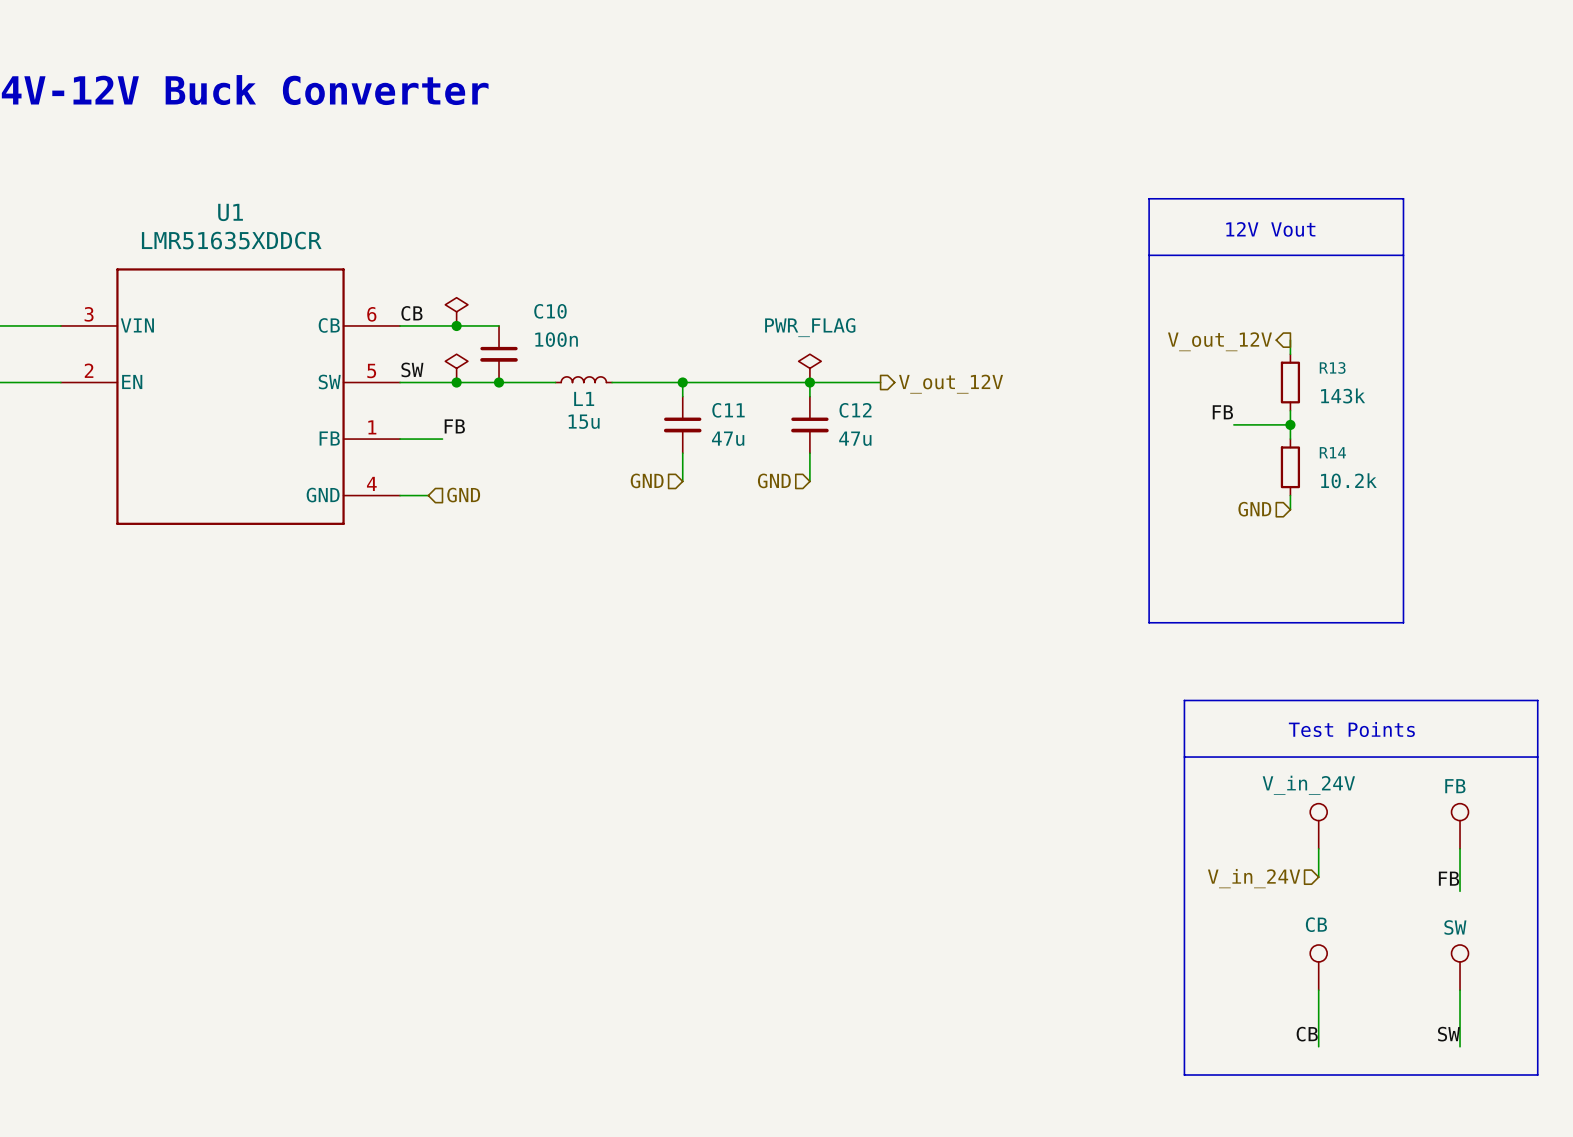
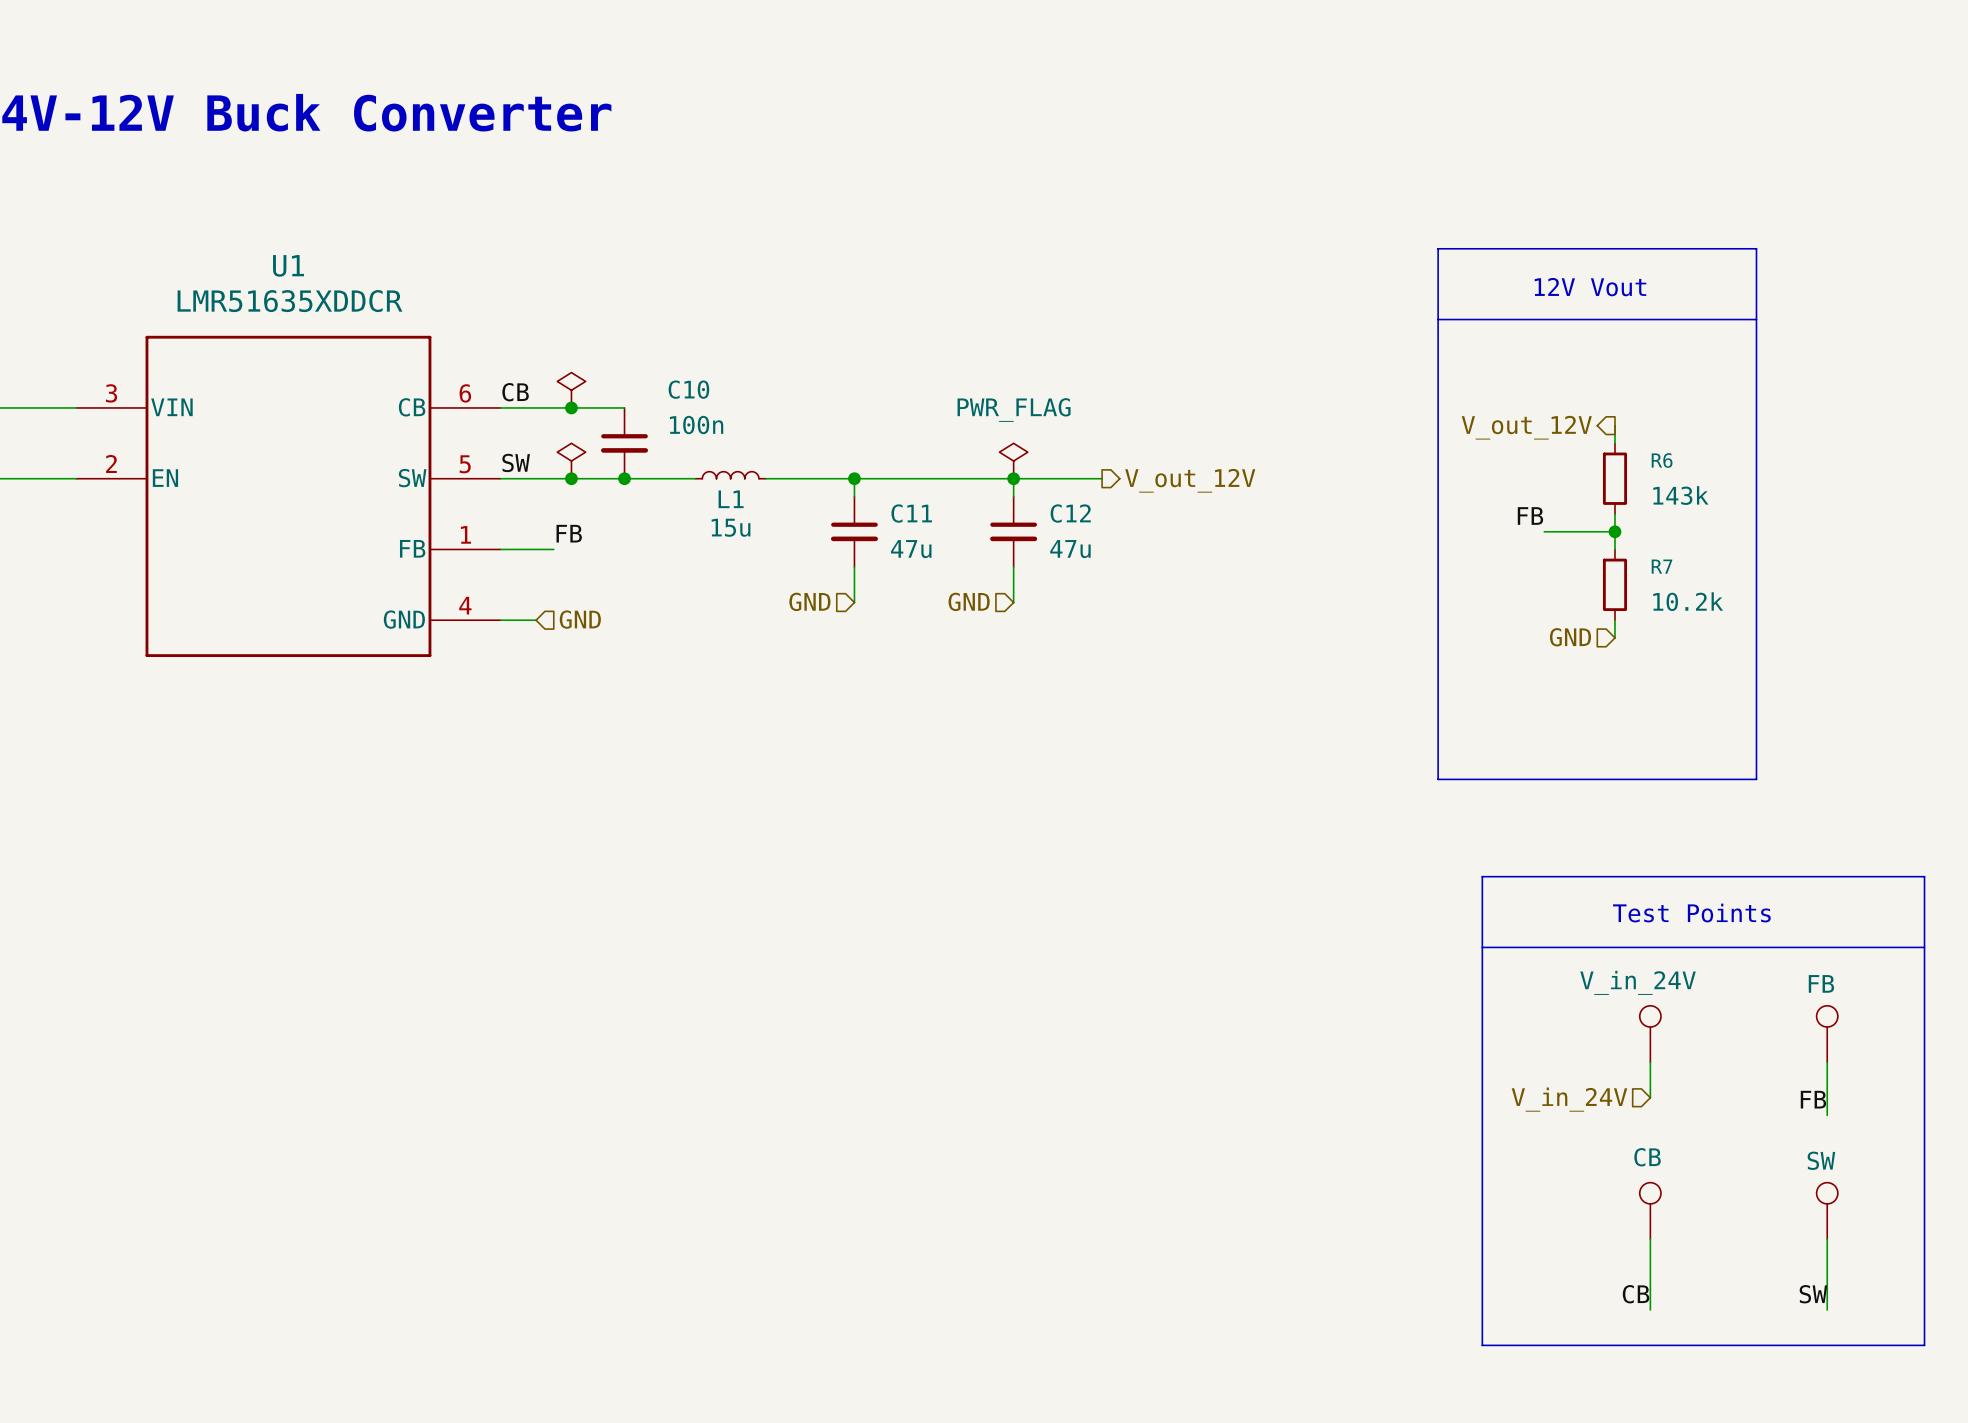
R13 name: R13 (1332, 367) -> R6 (1662, 460)
R14 name: R14 (1332, 452) -> R7 (1662, 566)

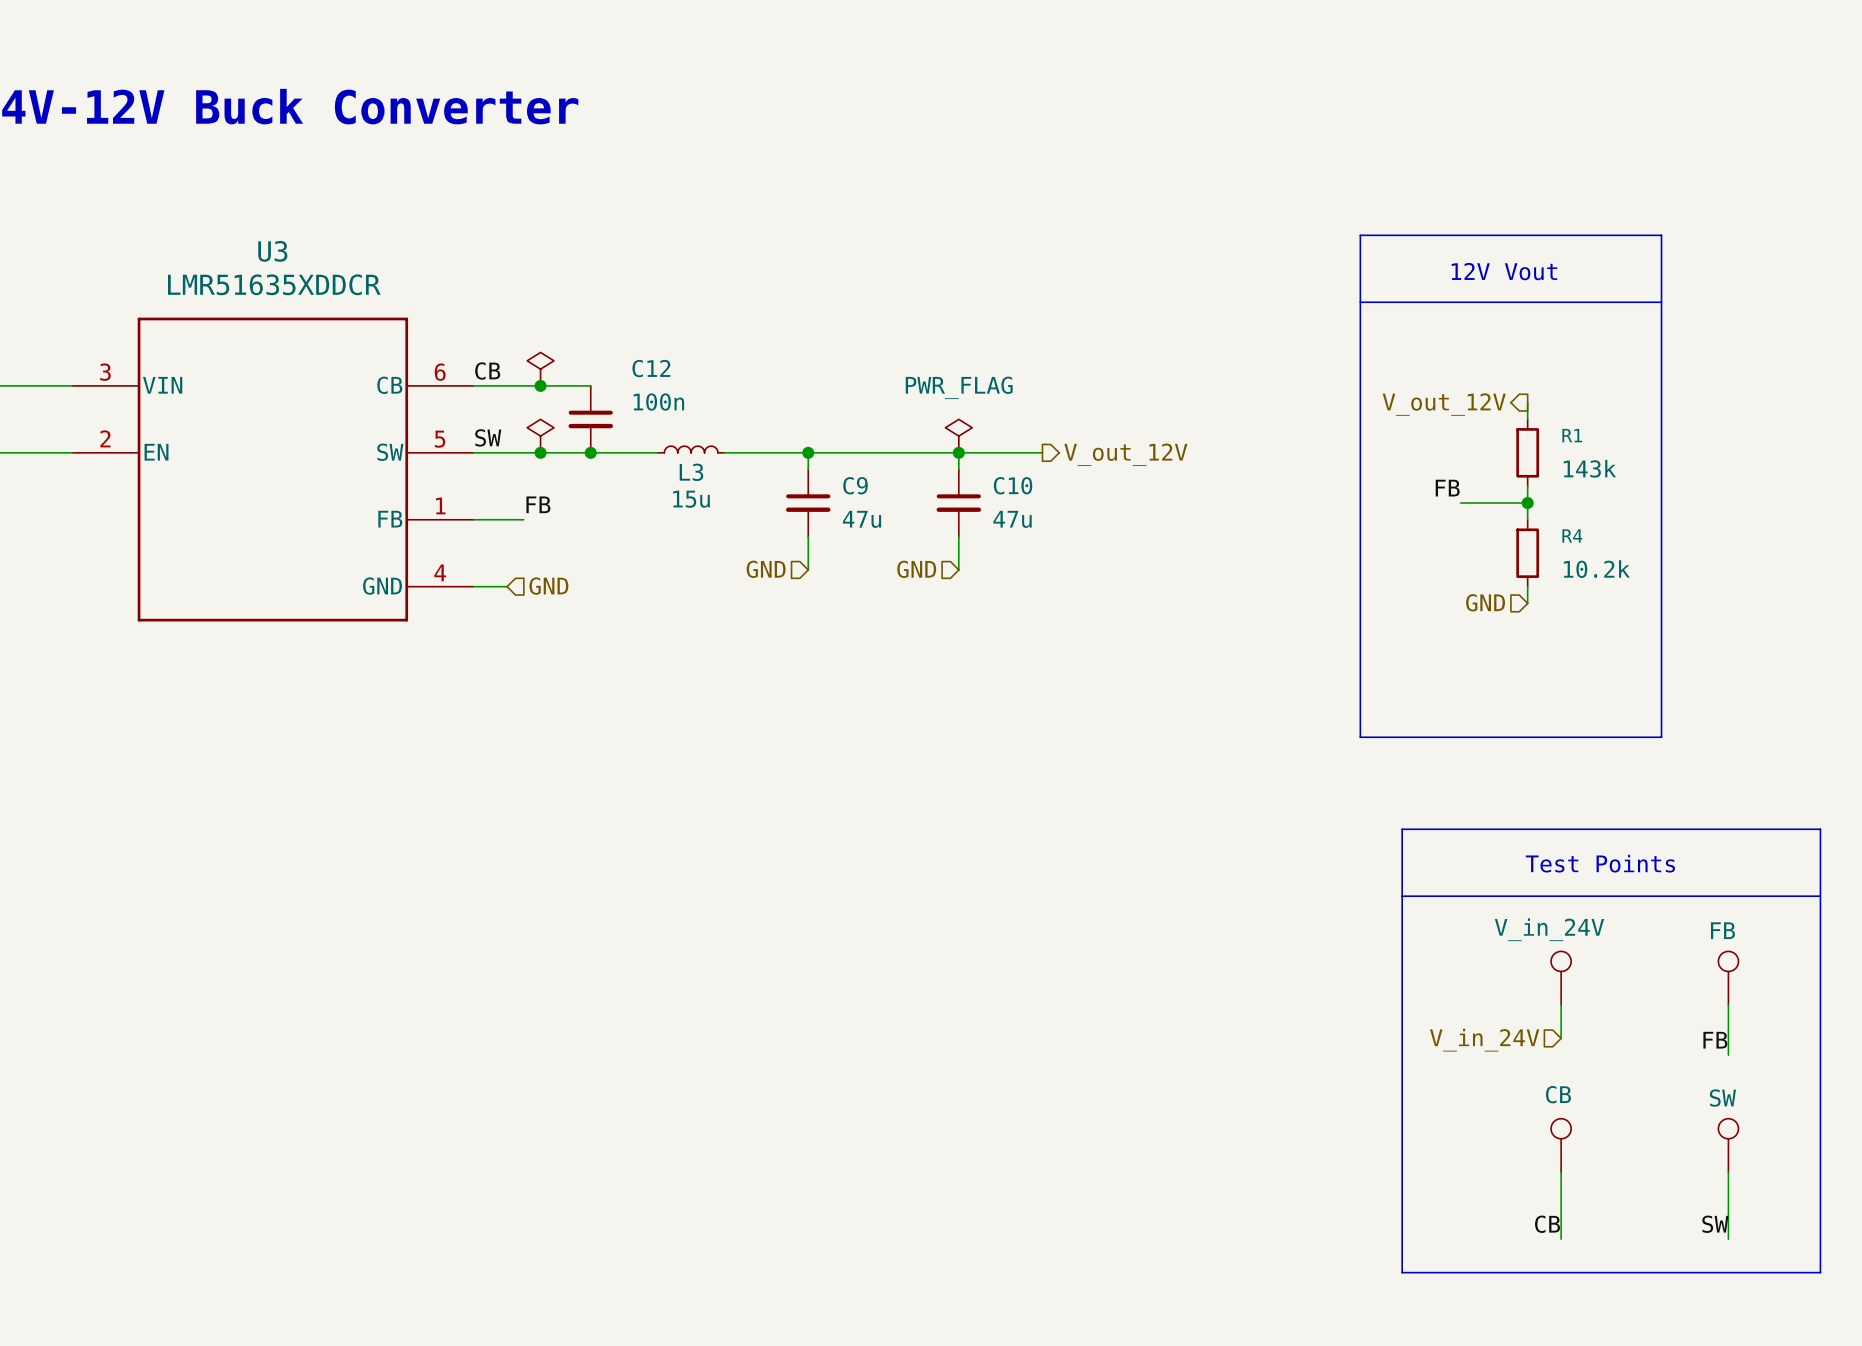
U1 name: U1 (288, 265) -> U3 (272, 251)
C10 name: C10 (688, 389) -> C12 (651, 368)
R6 name: R6 (1662, 460) -> R1 (1572, 435)
L1 name: L1 (731, 499) -> L3 (691, 472)
C11 name: C11 (911, 513) -> C9 (855, 485)
C12 name: C12 (1070, 513) -> C10 (1013, 485)
R7 name: R7 (1662, 566) -> R4 (1572, 535)

